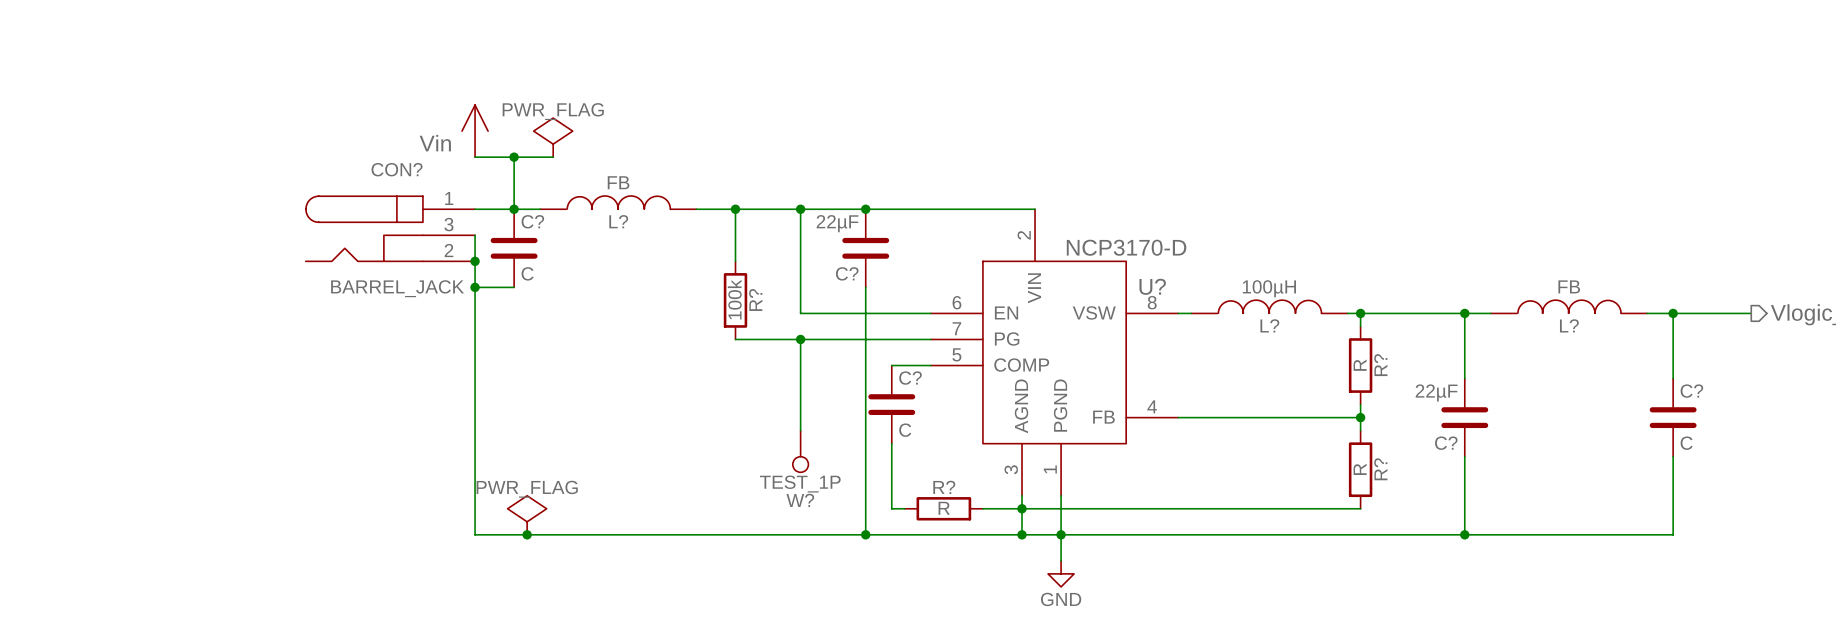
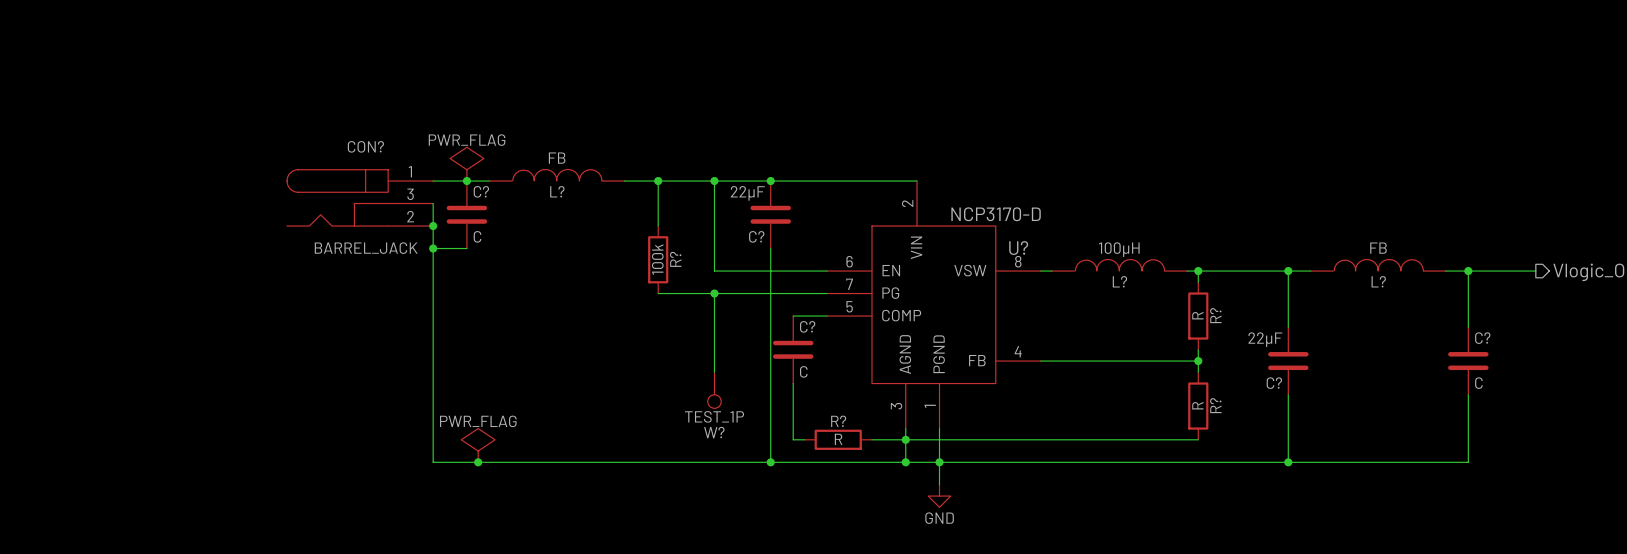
power symbol: Vin (475, 131) -> none
power symbol position: PWR_FLAG (553, 137) -> PWR_FLAG (466, 164)
wire: (475, 157) (553, 157) -> none
wire: (514, 157) (514, 209) -> none
junction: (514, 157) -> none

